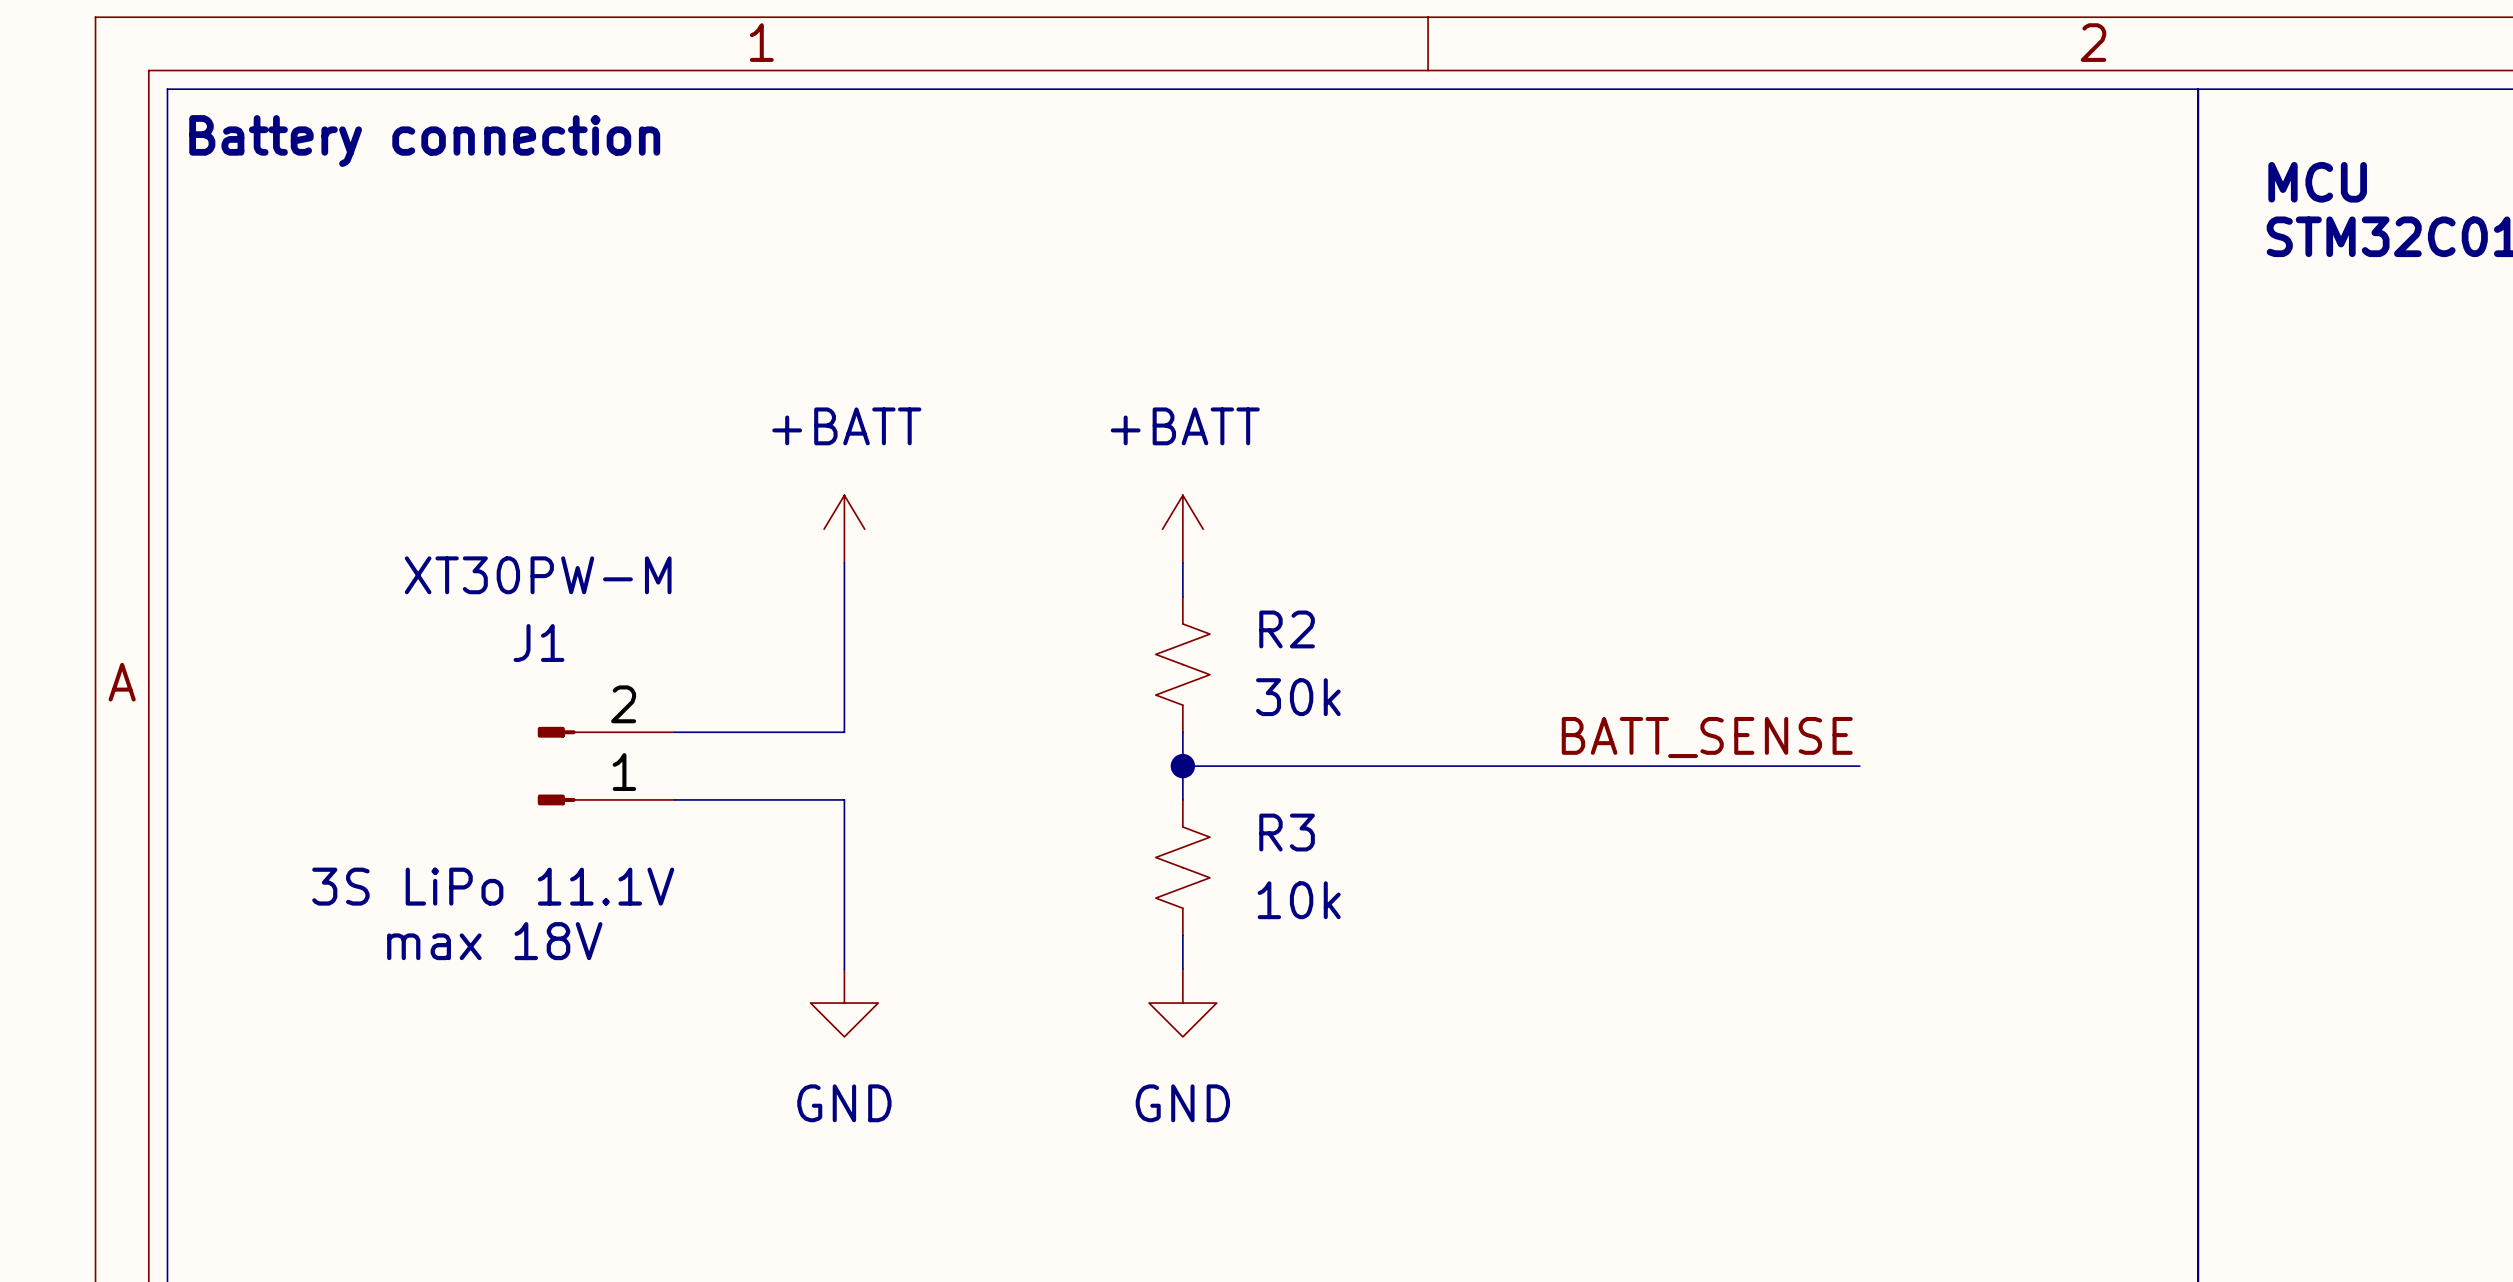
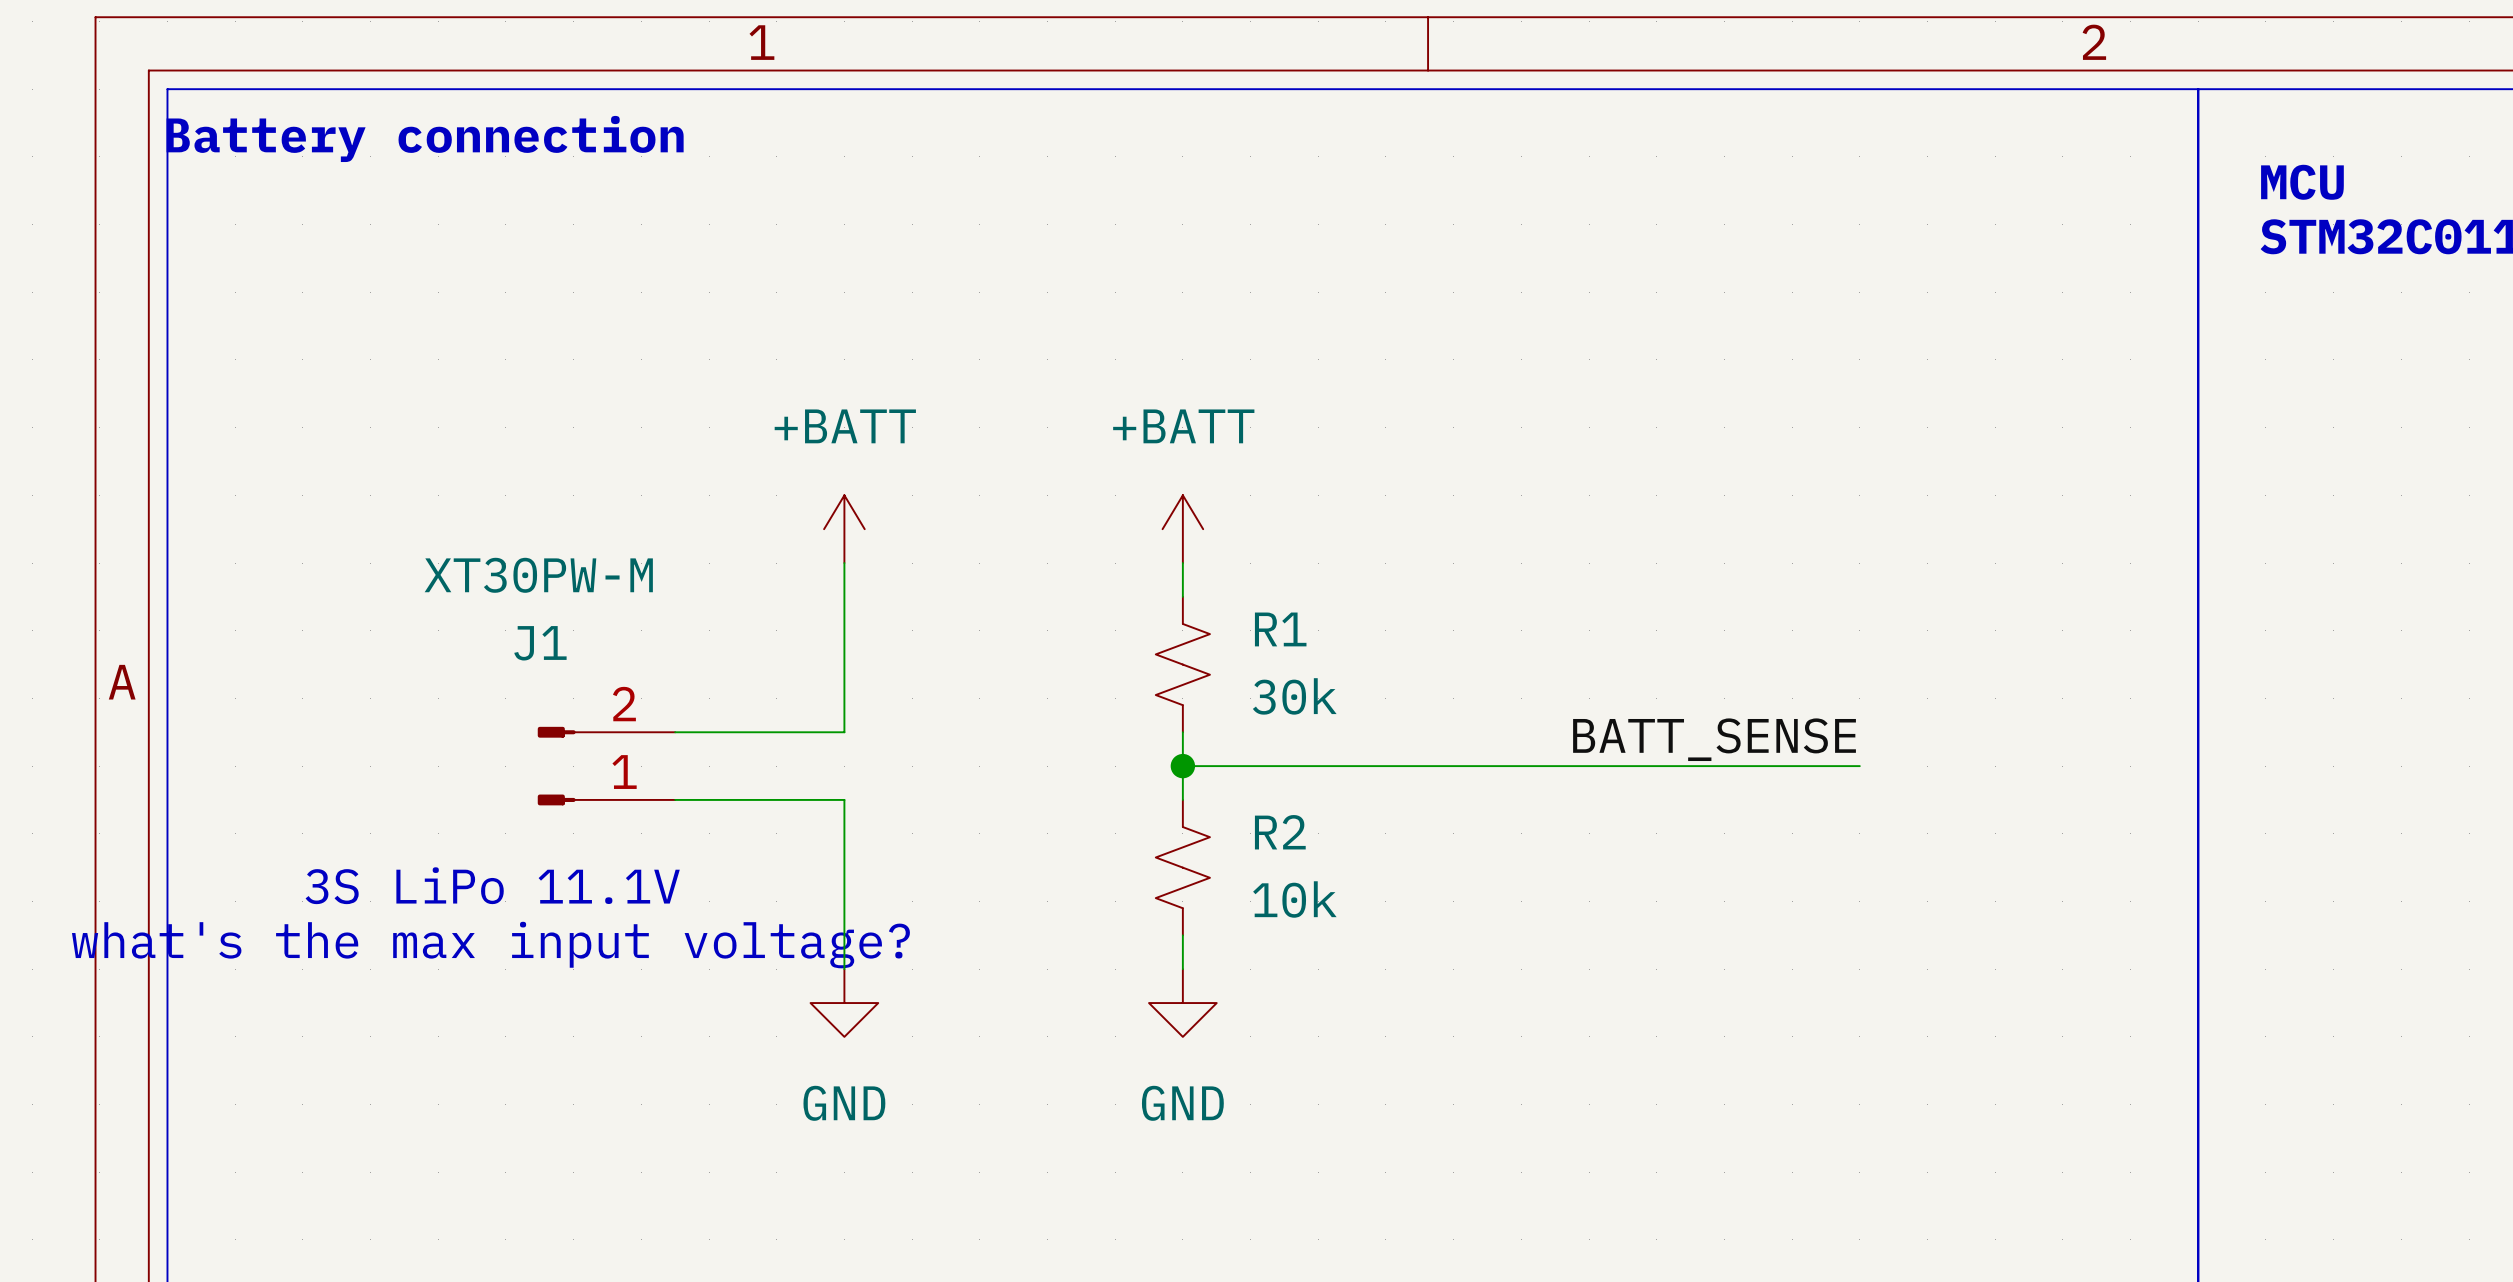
R2 name: R2 (1287, 629) -> R1 (1280, 629)
R3 name: R3 (1287, 832) -> R2 (1280, 832)
text: max 18V (494, 941) -> what's the max input voltage? (490, 945)

